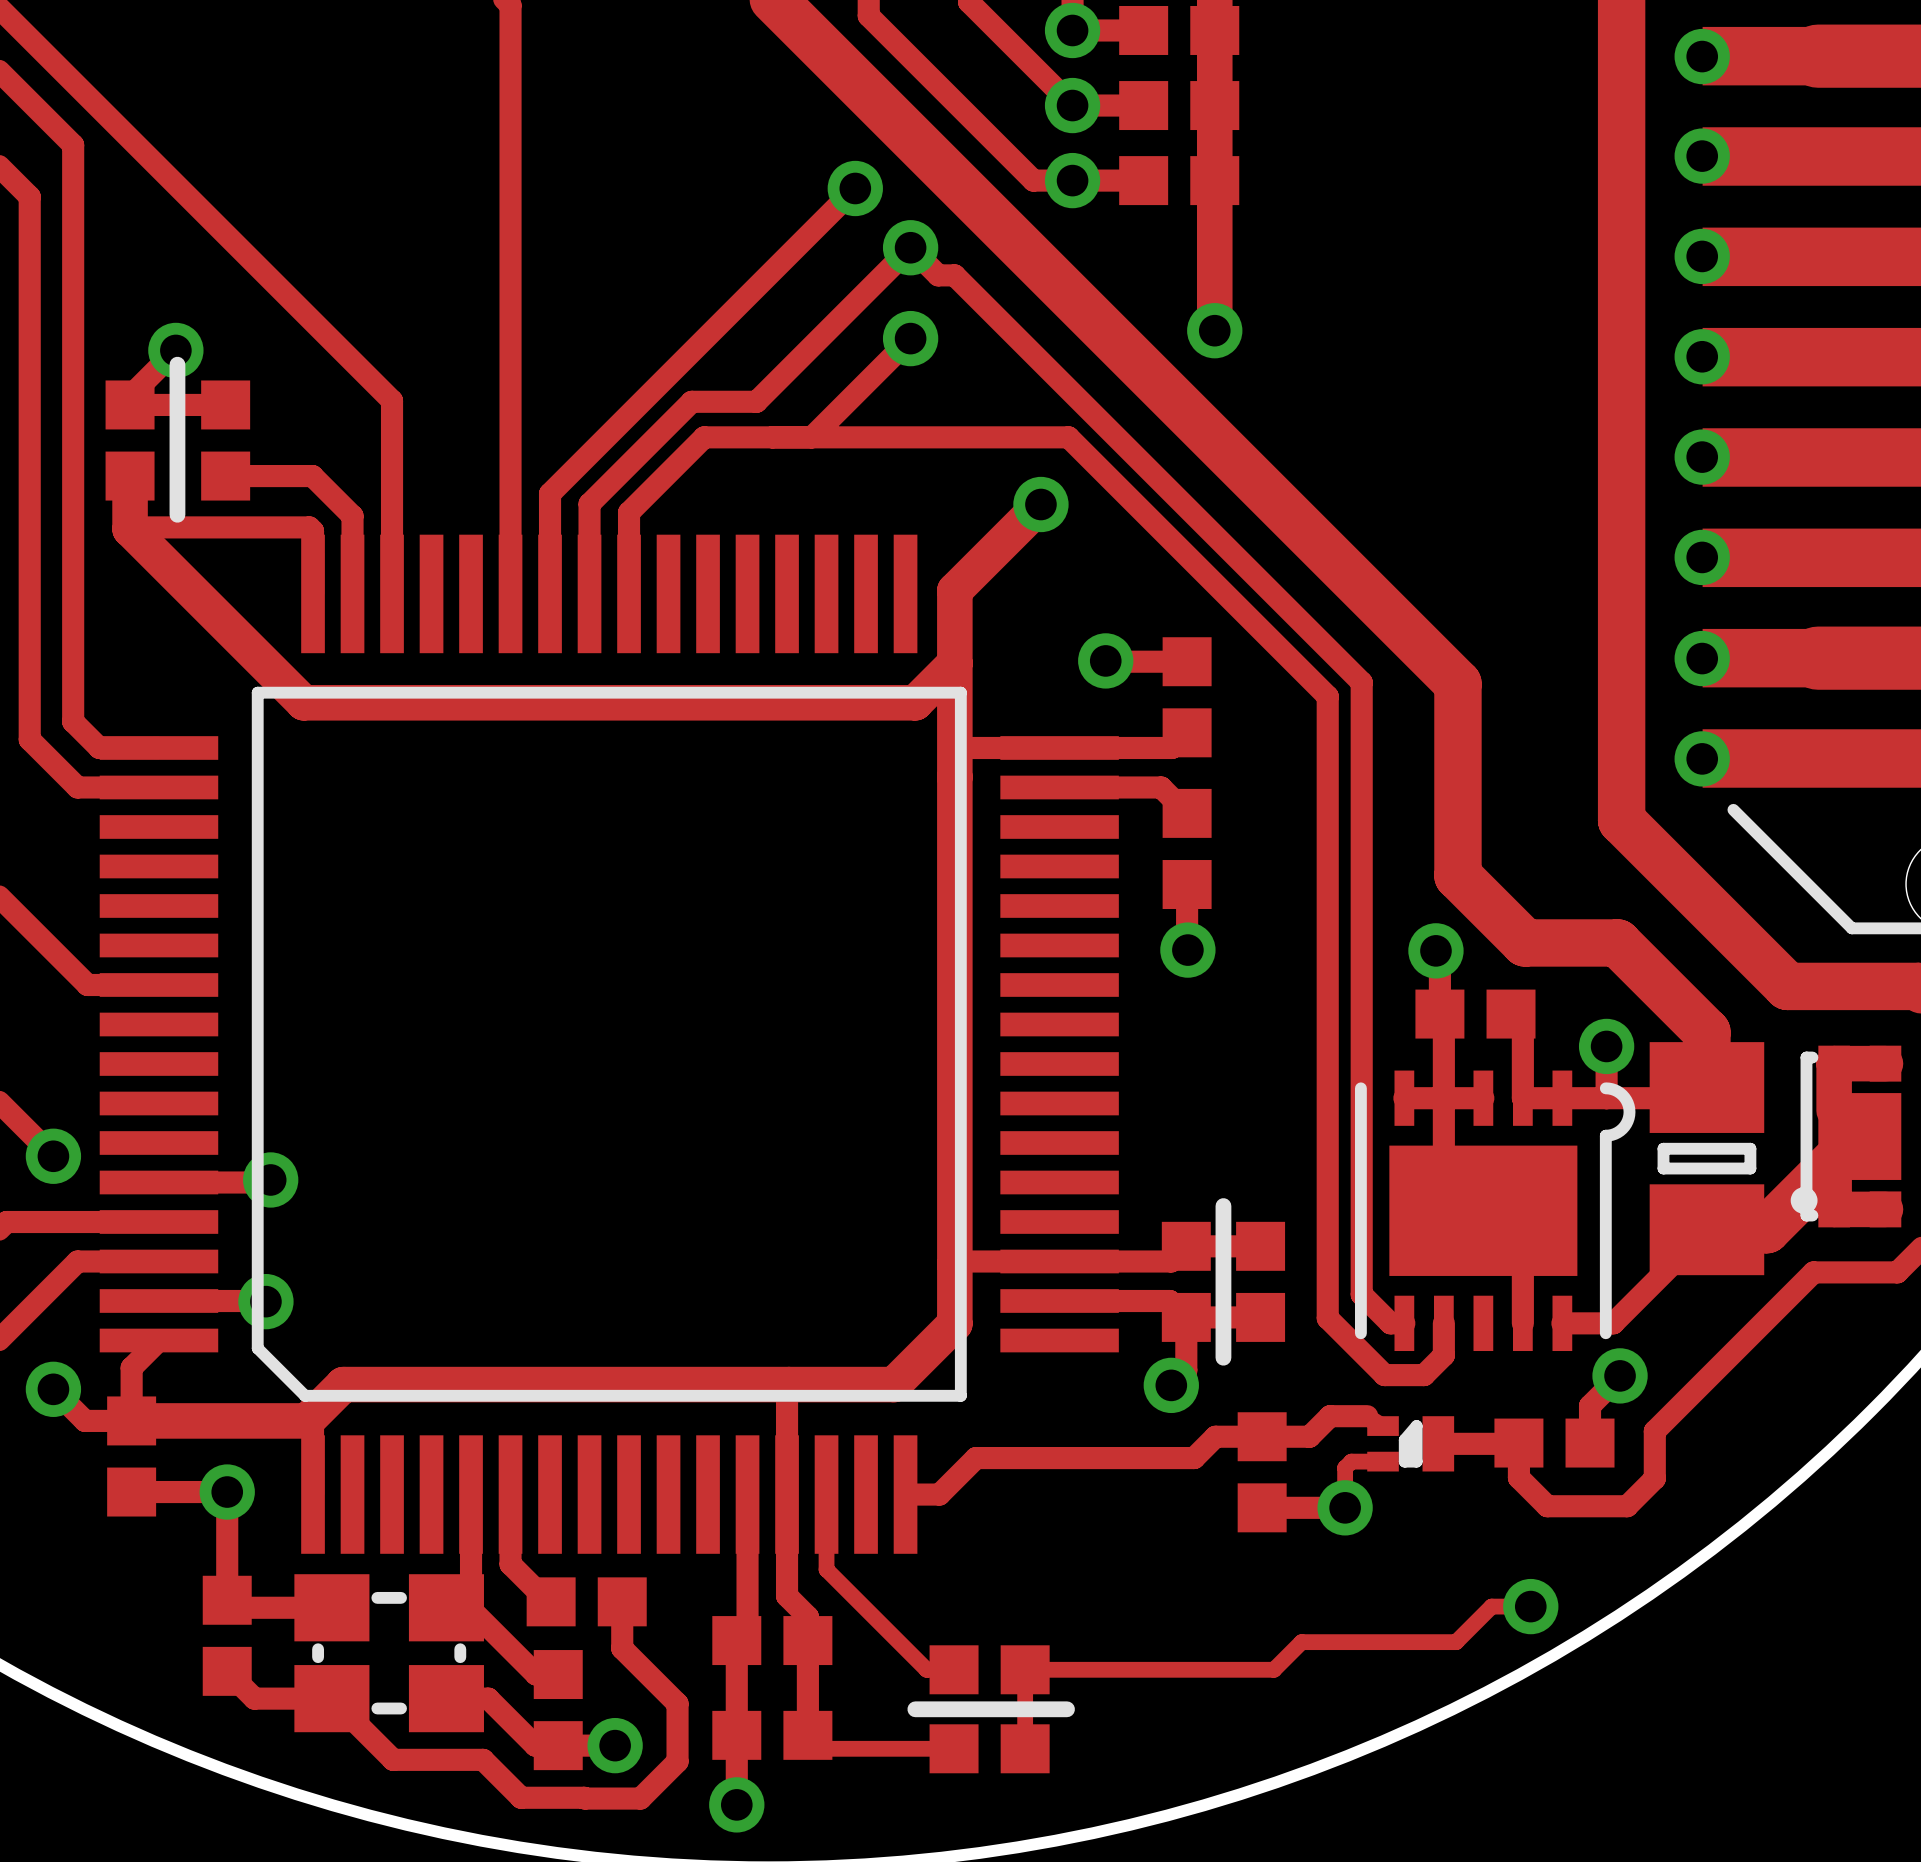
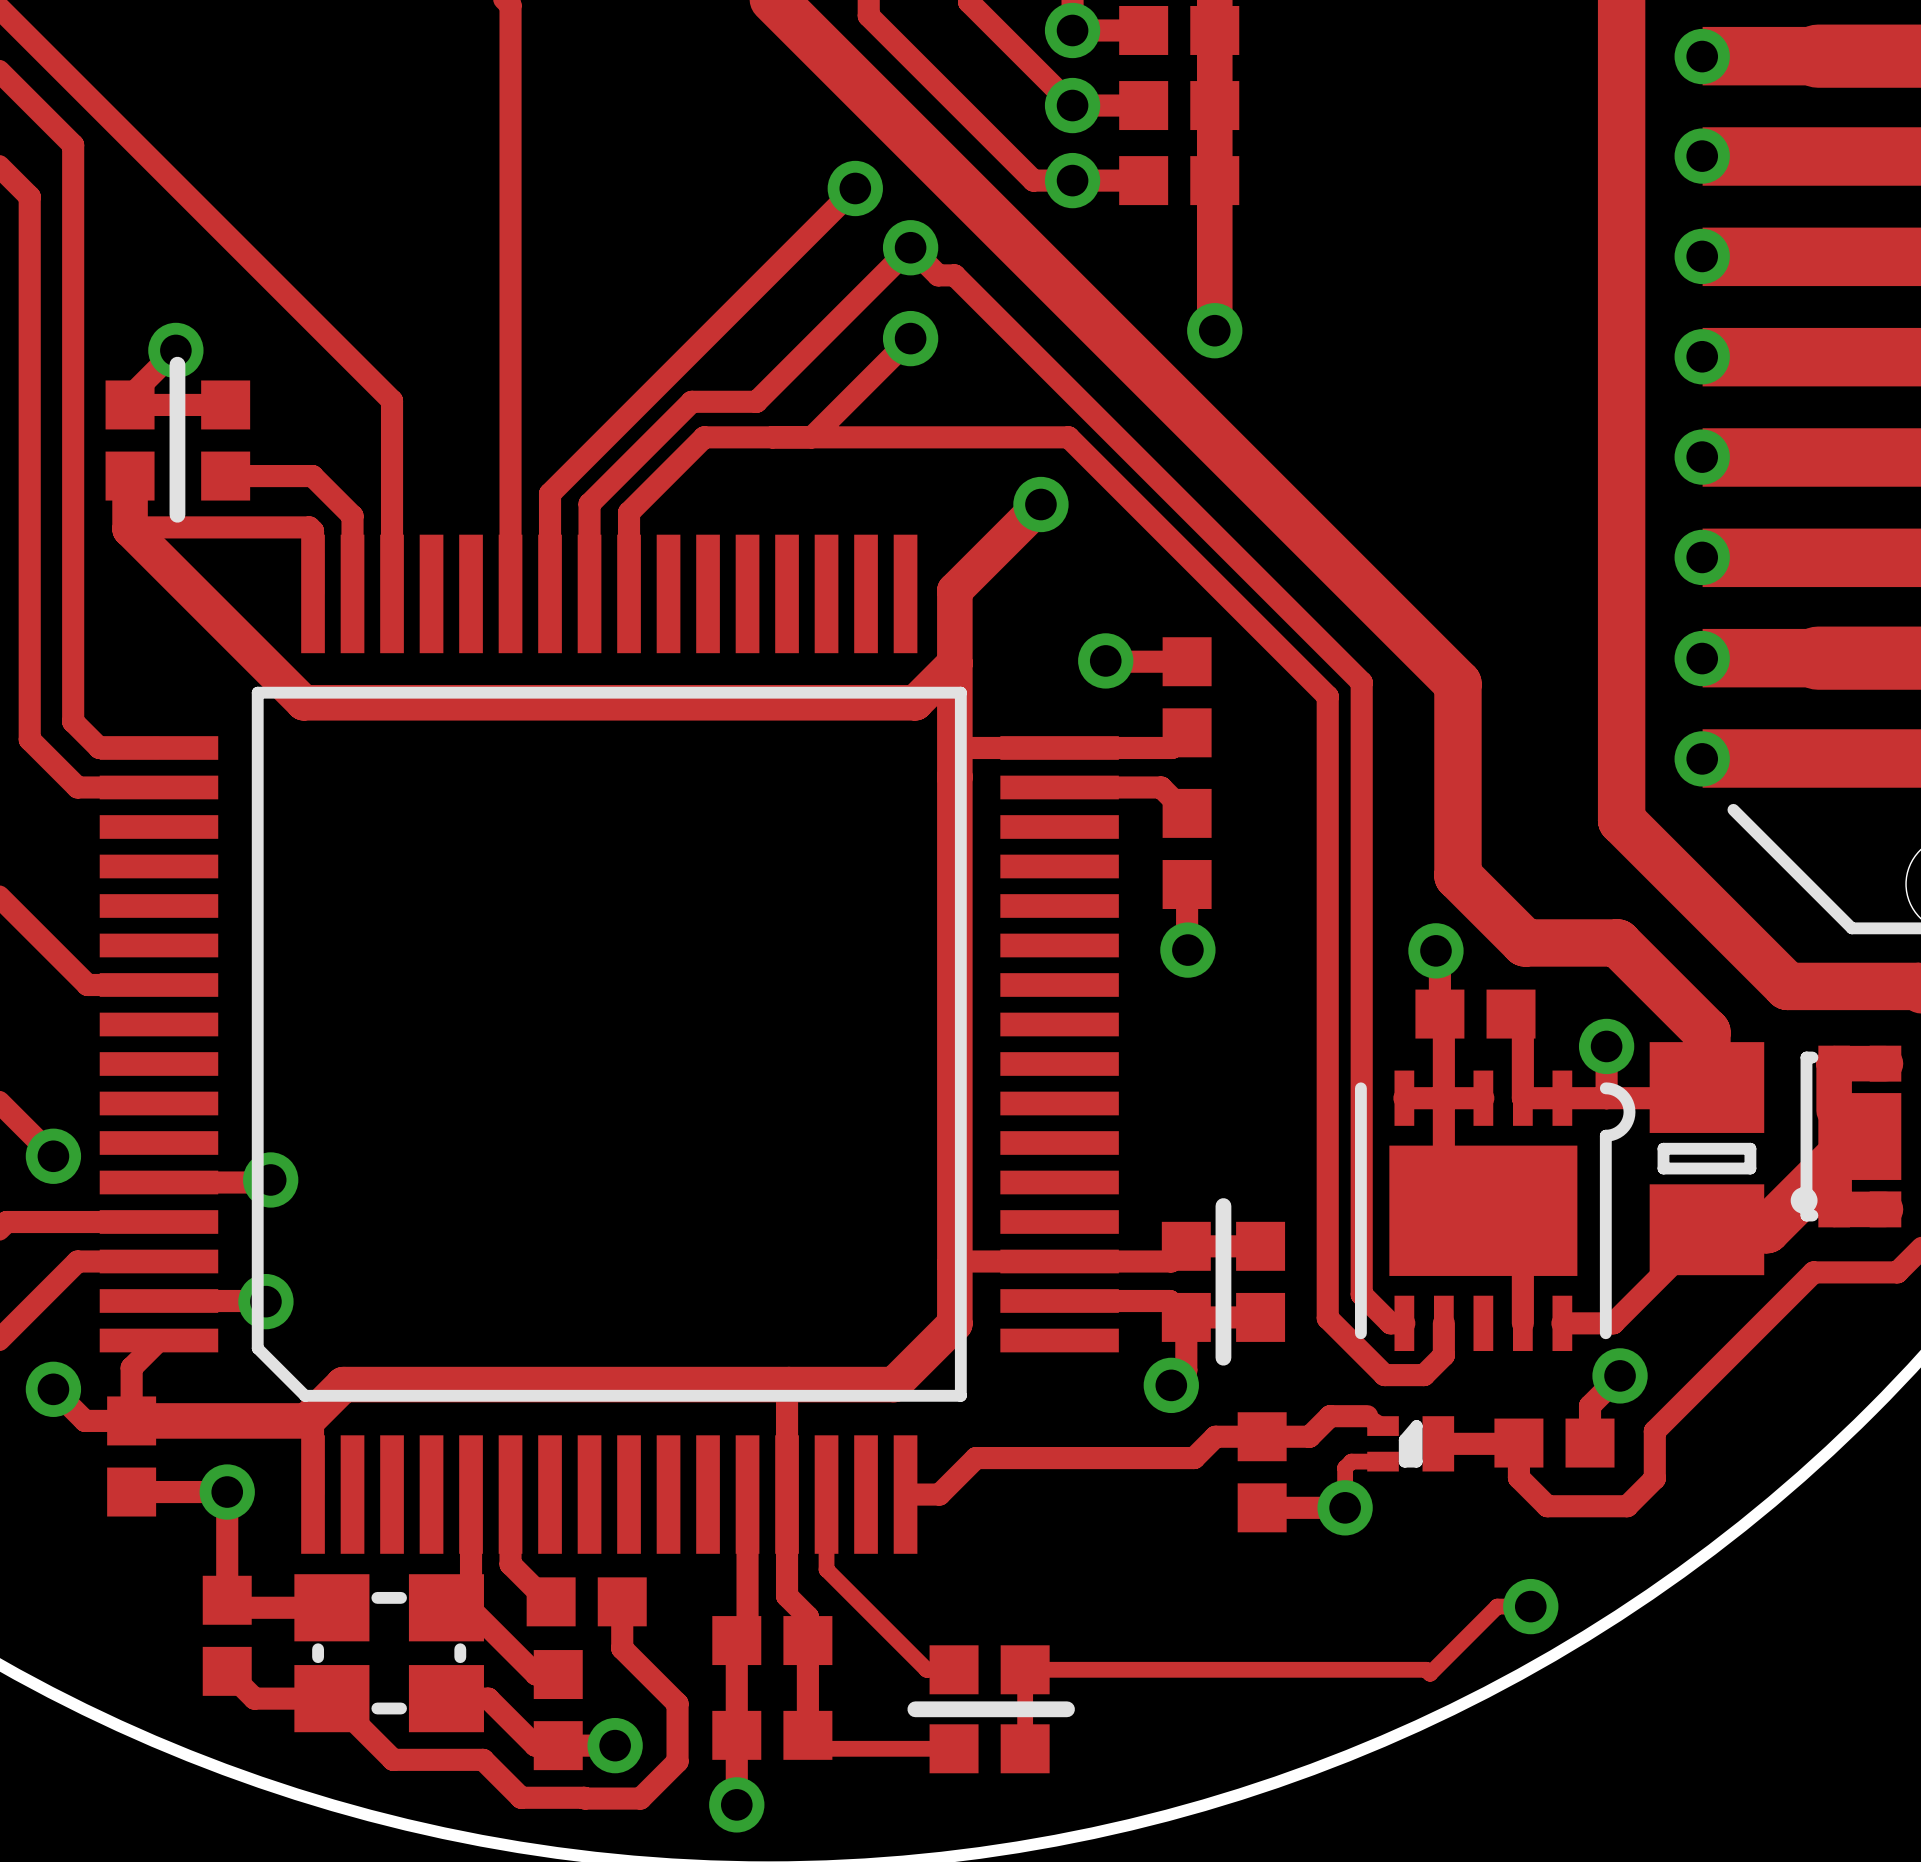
track: (1497, 1606) (1491, 1606) (1456, 1642) (1301, 1642) (1274, 1669) -> (1497, 1606) (1430, 1673) (1426, 1669) (1274, 1669)

